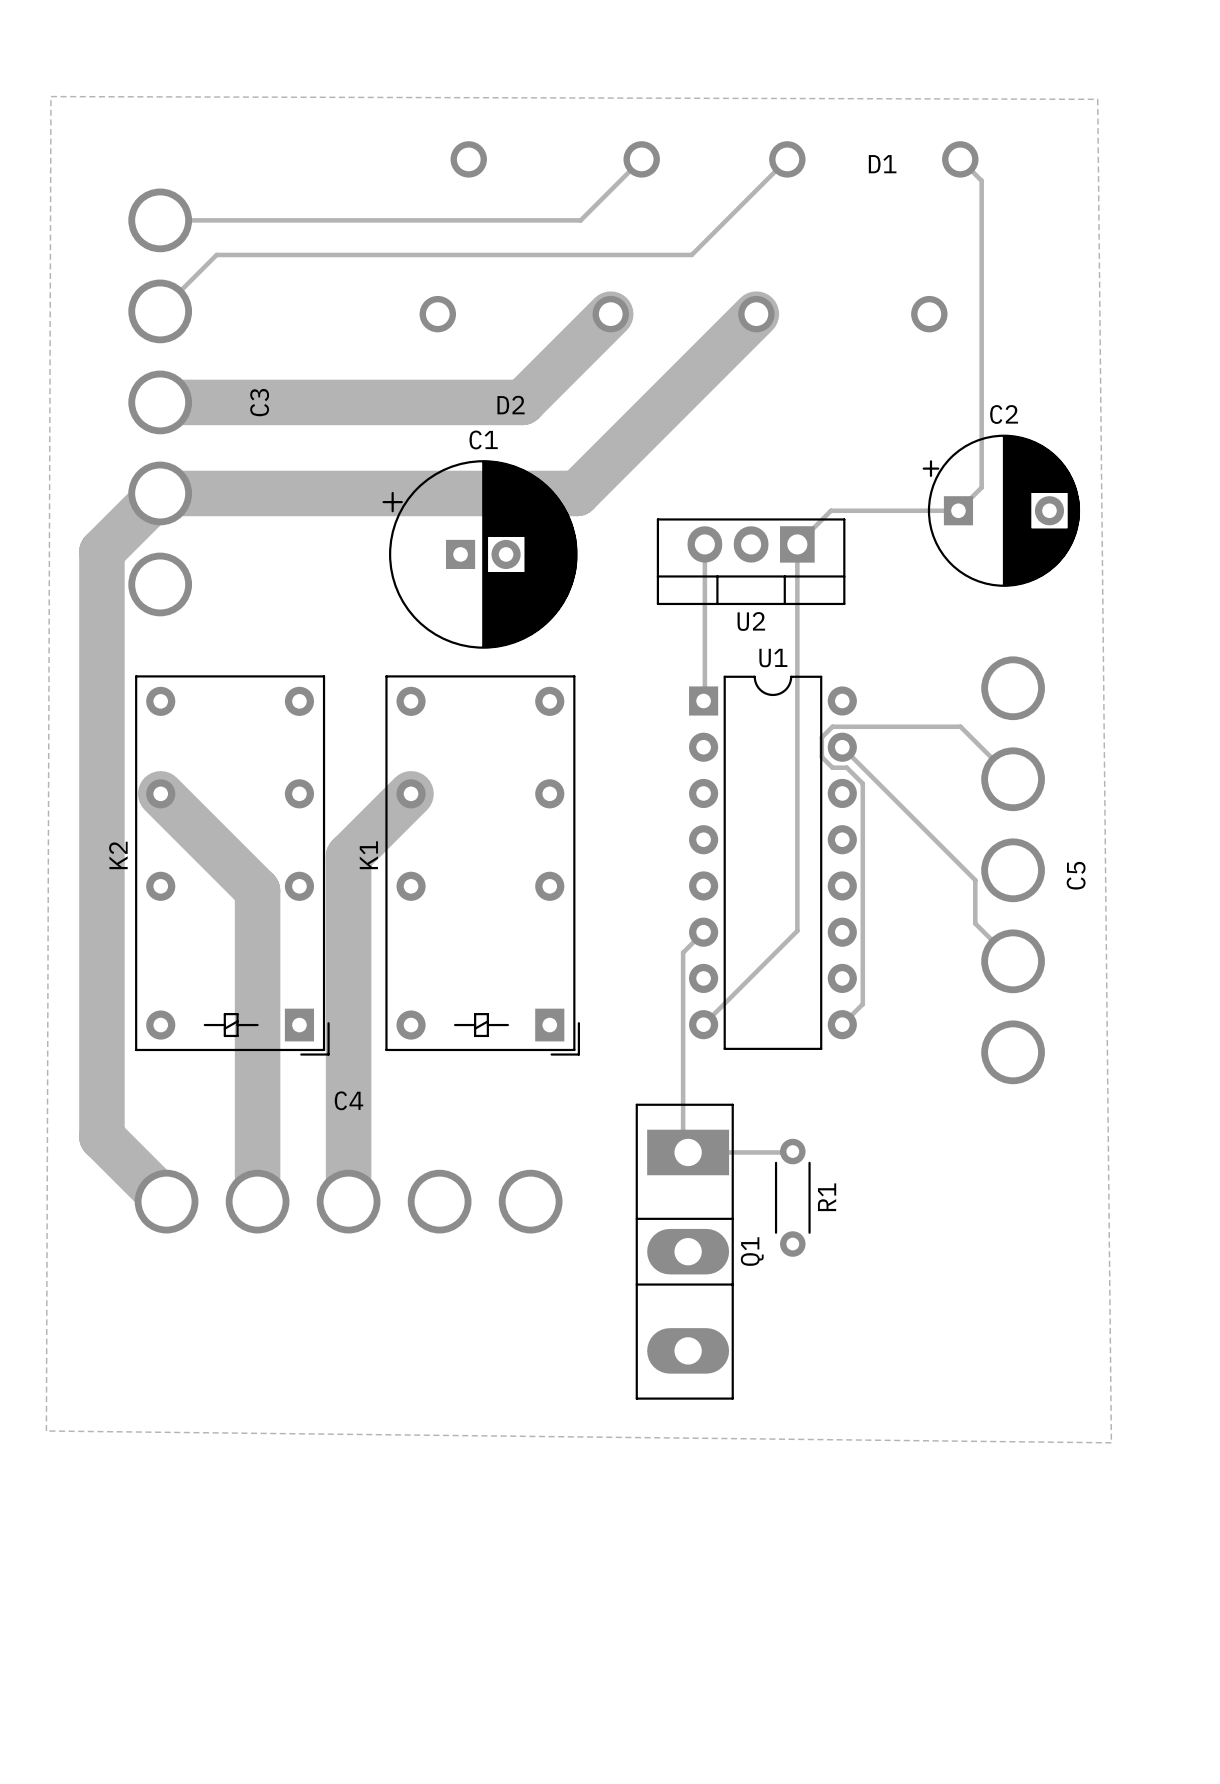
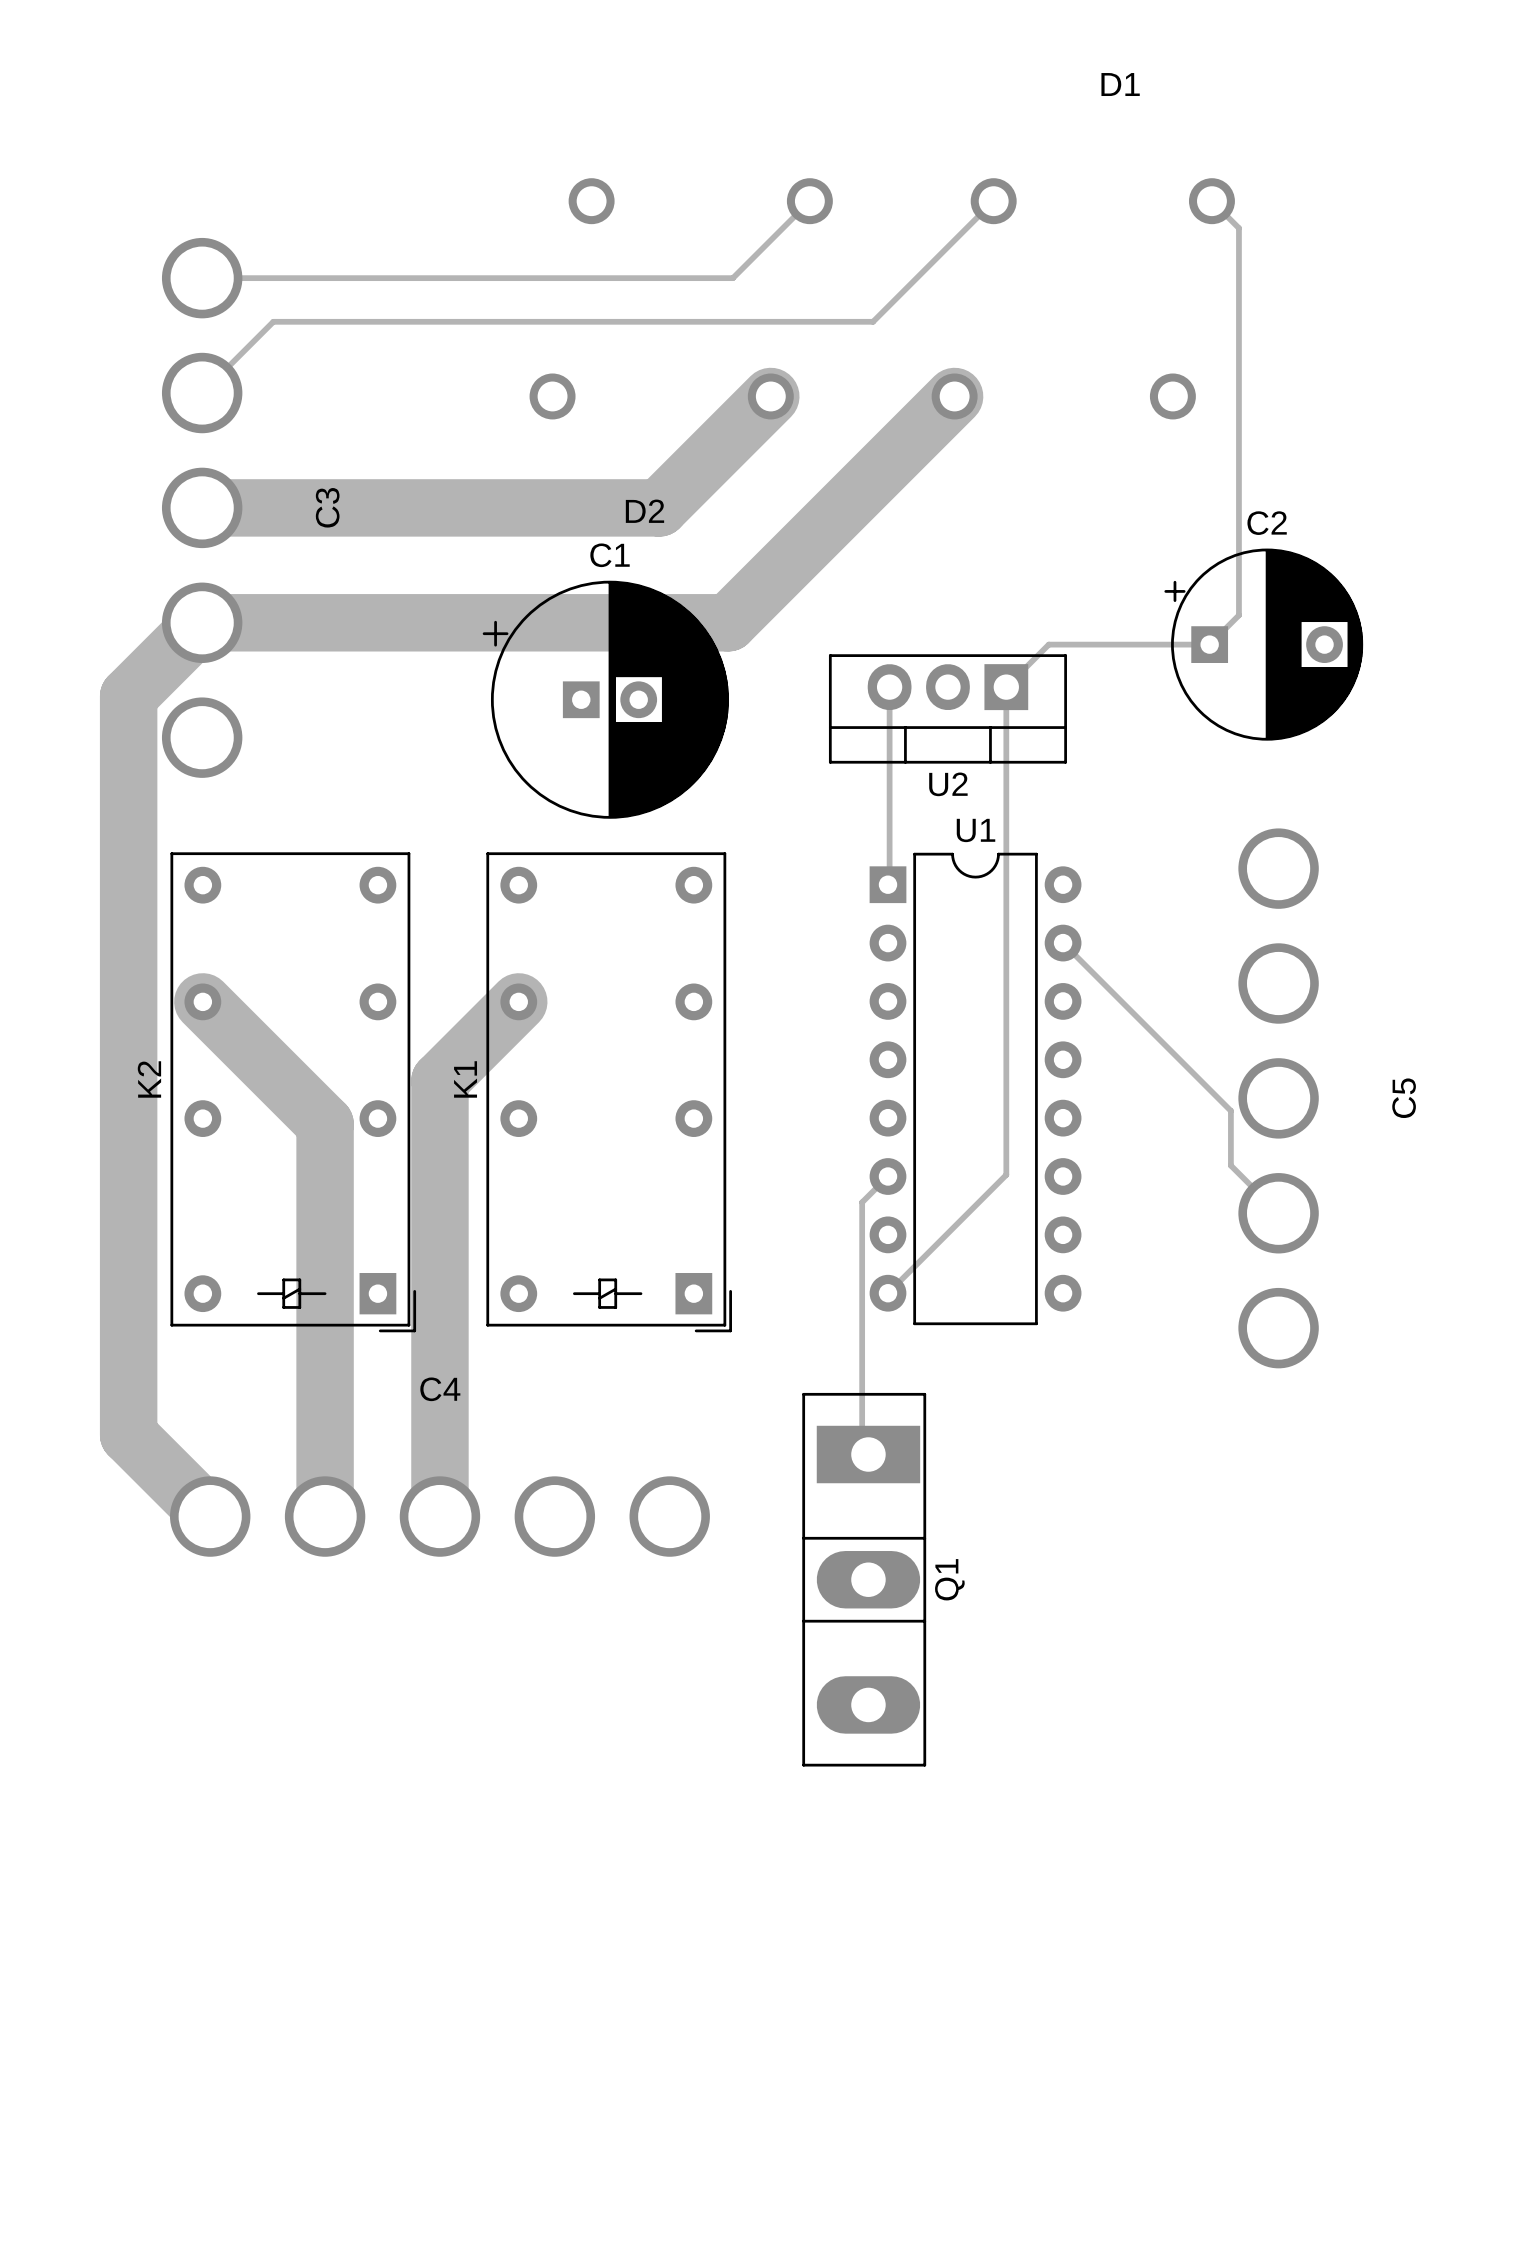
zone outline: (50, 96) (46, 1431) (1111, 1442) (1097, 99) (50, 96) -> none
D1 name position: D1 (882, 164) -> D1 (1120, 84)
track: (1013, 779) (960, 726) (832, 726) (821, 737) (821, 757) (832, 767) (846, 767) (862, 783) (862, 1004) (842, 1024) -> none
C5 name position: C5 (1076, 875) -> C5 (1404, 1098)
track: (792, 1151) (688, 1152) -> none
R1: (792, 1197) -> none

